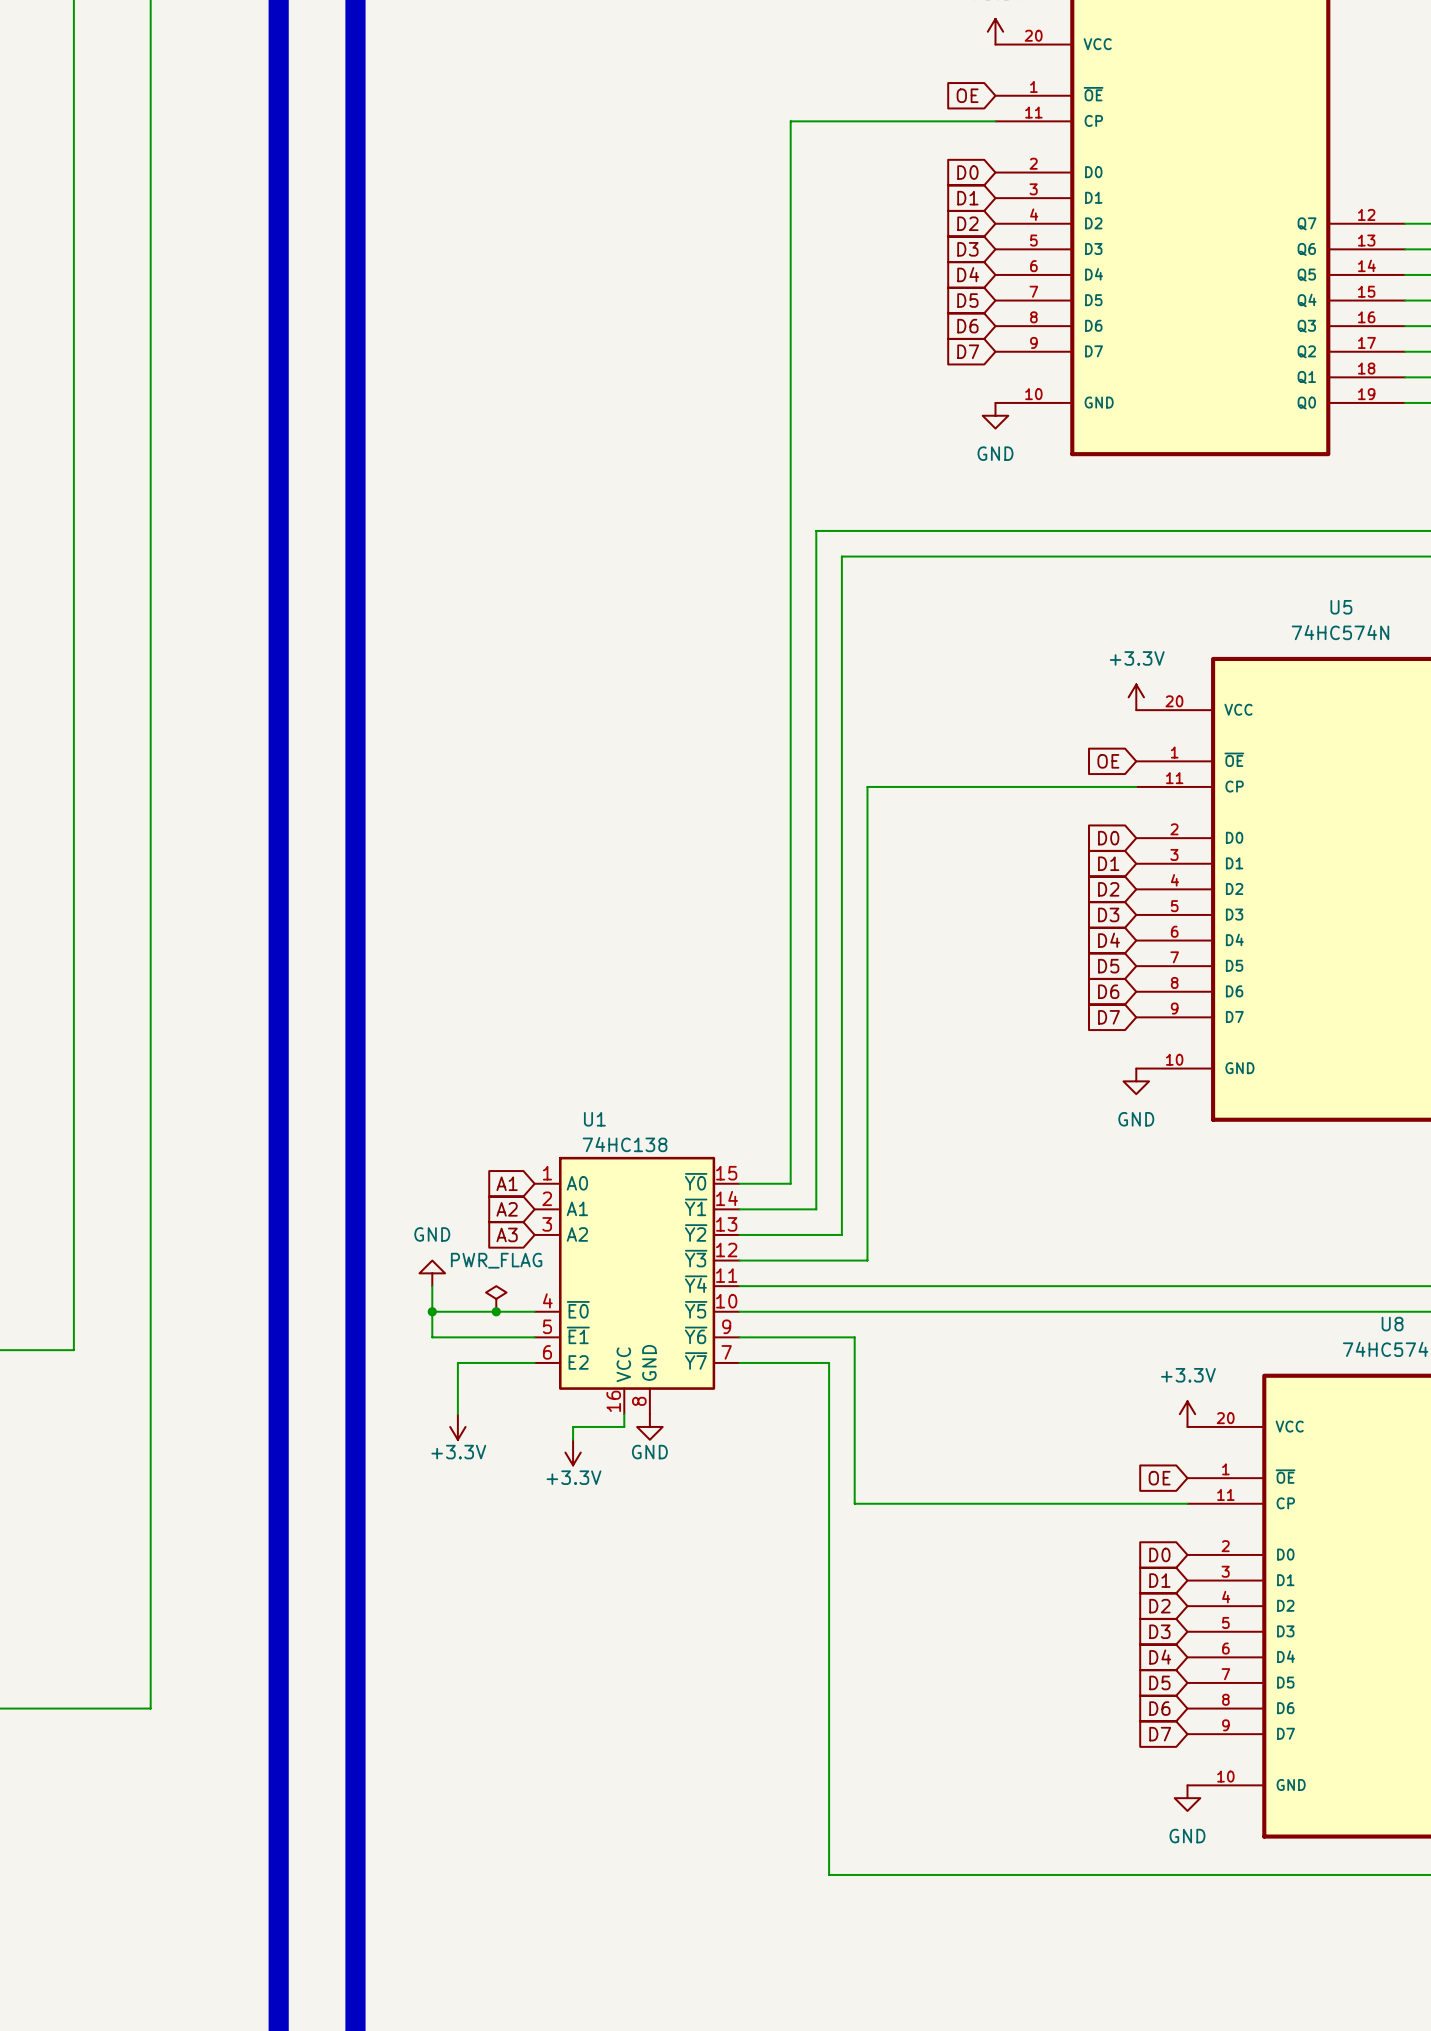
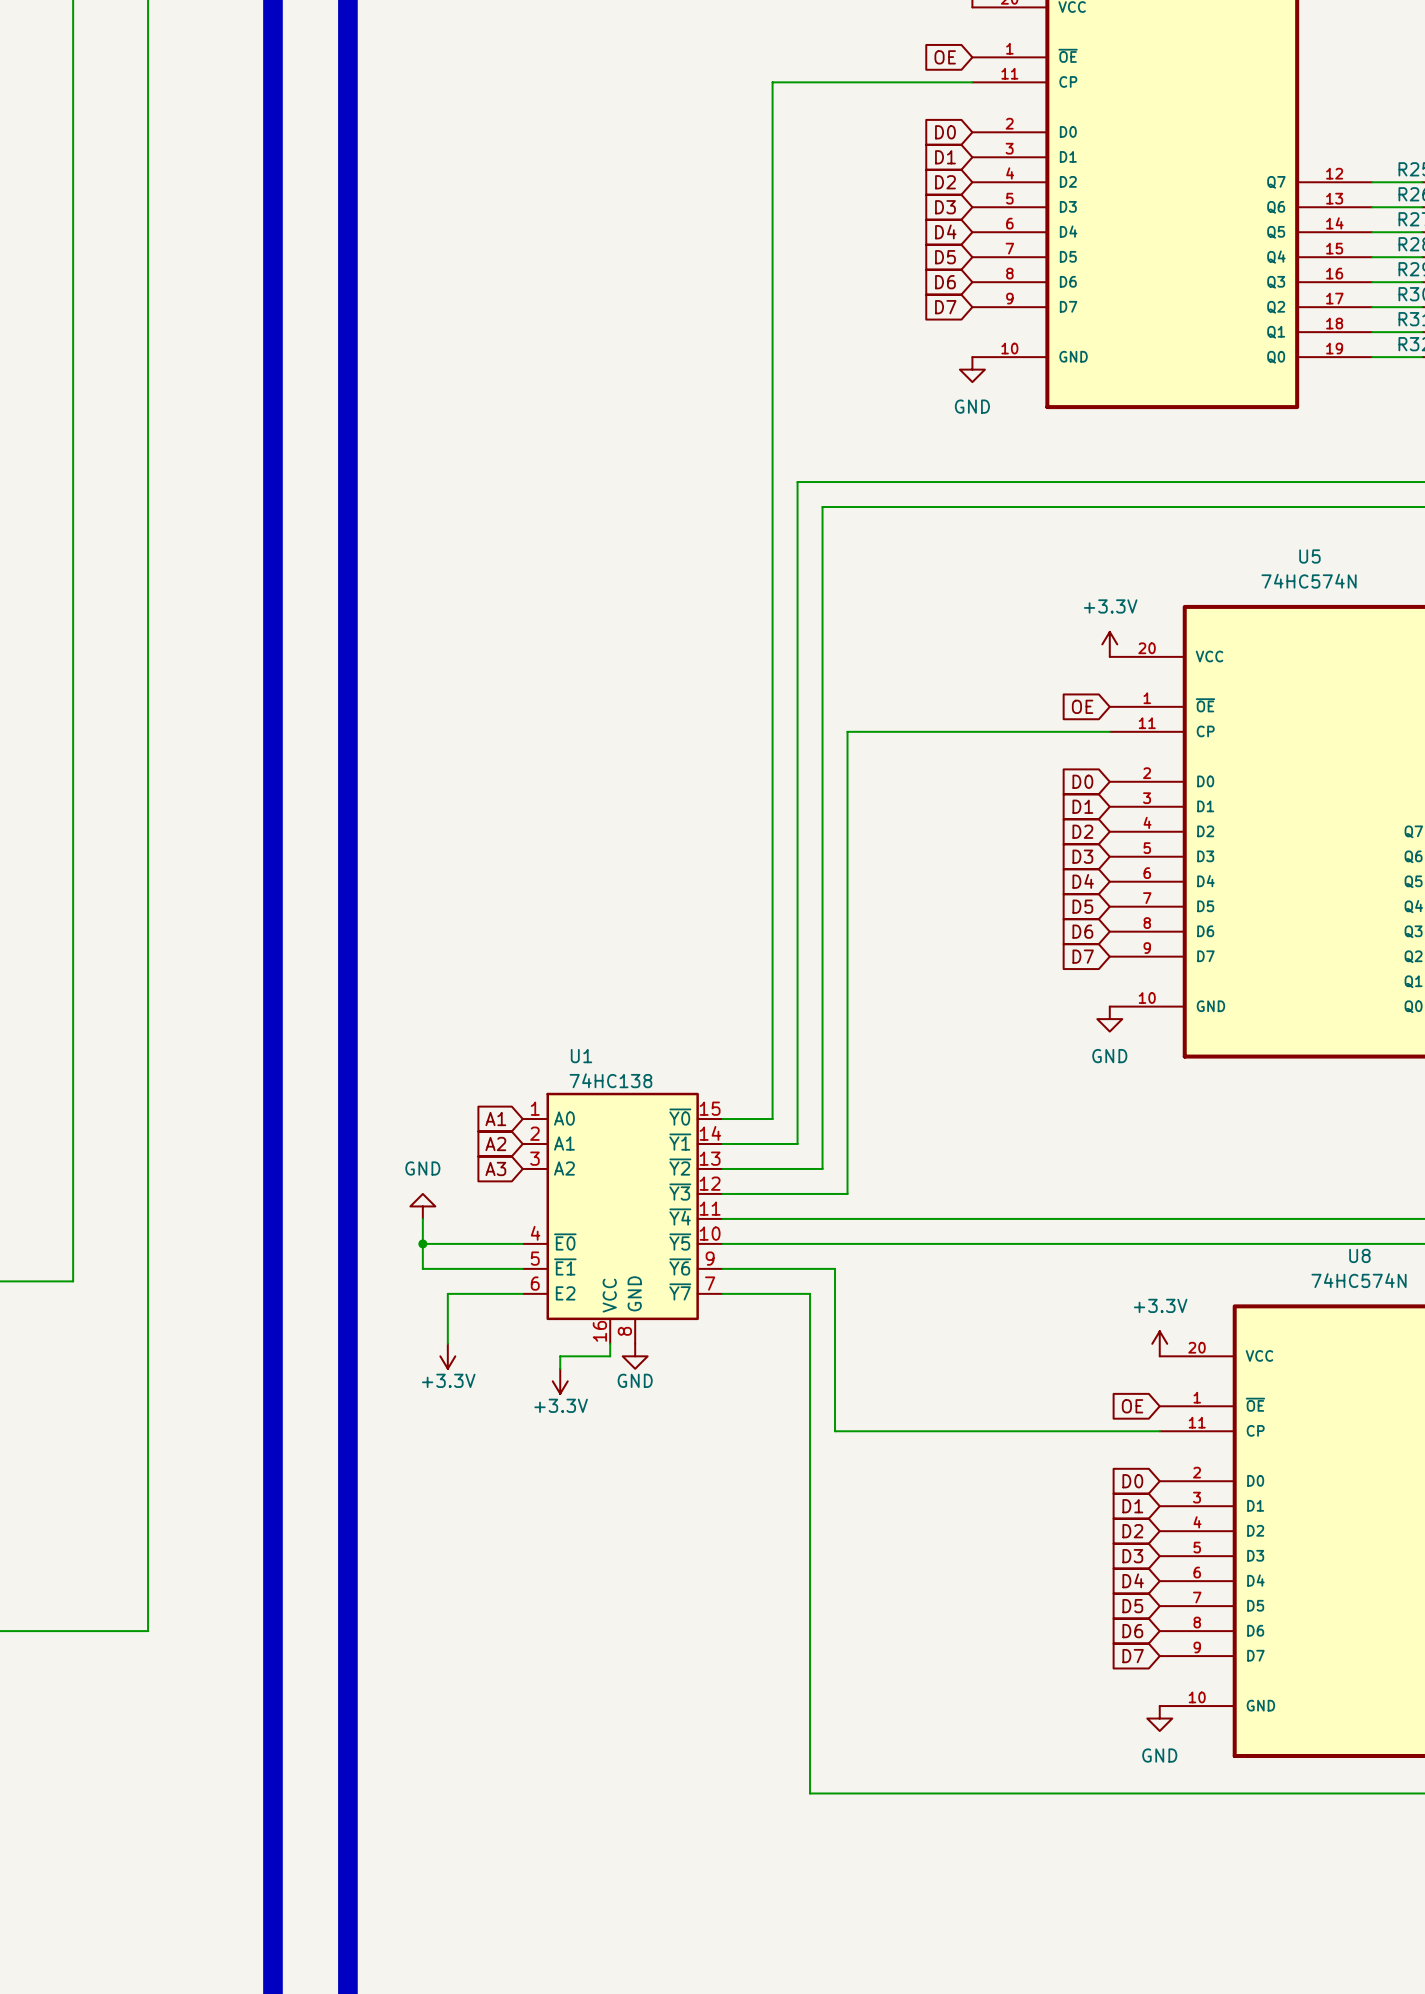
power symbol: PWR_FLAG (496, 1298) -> none
junction: (496, 1311) -> none

